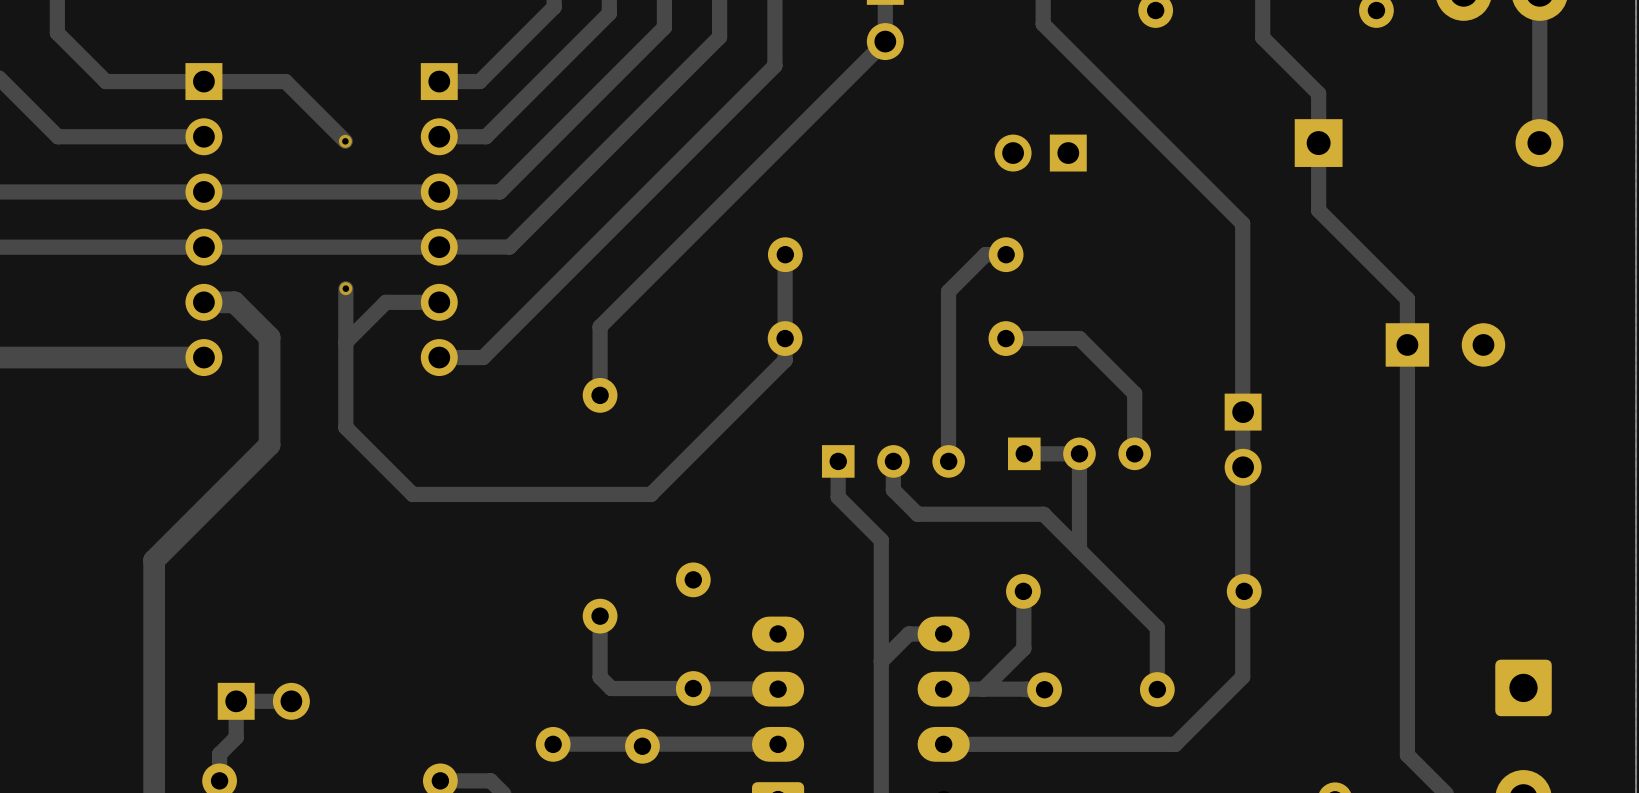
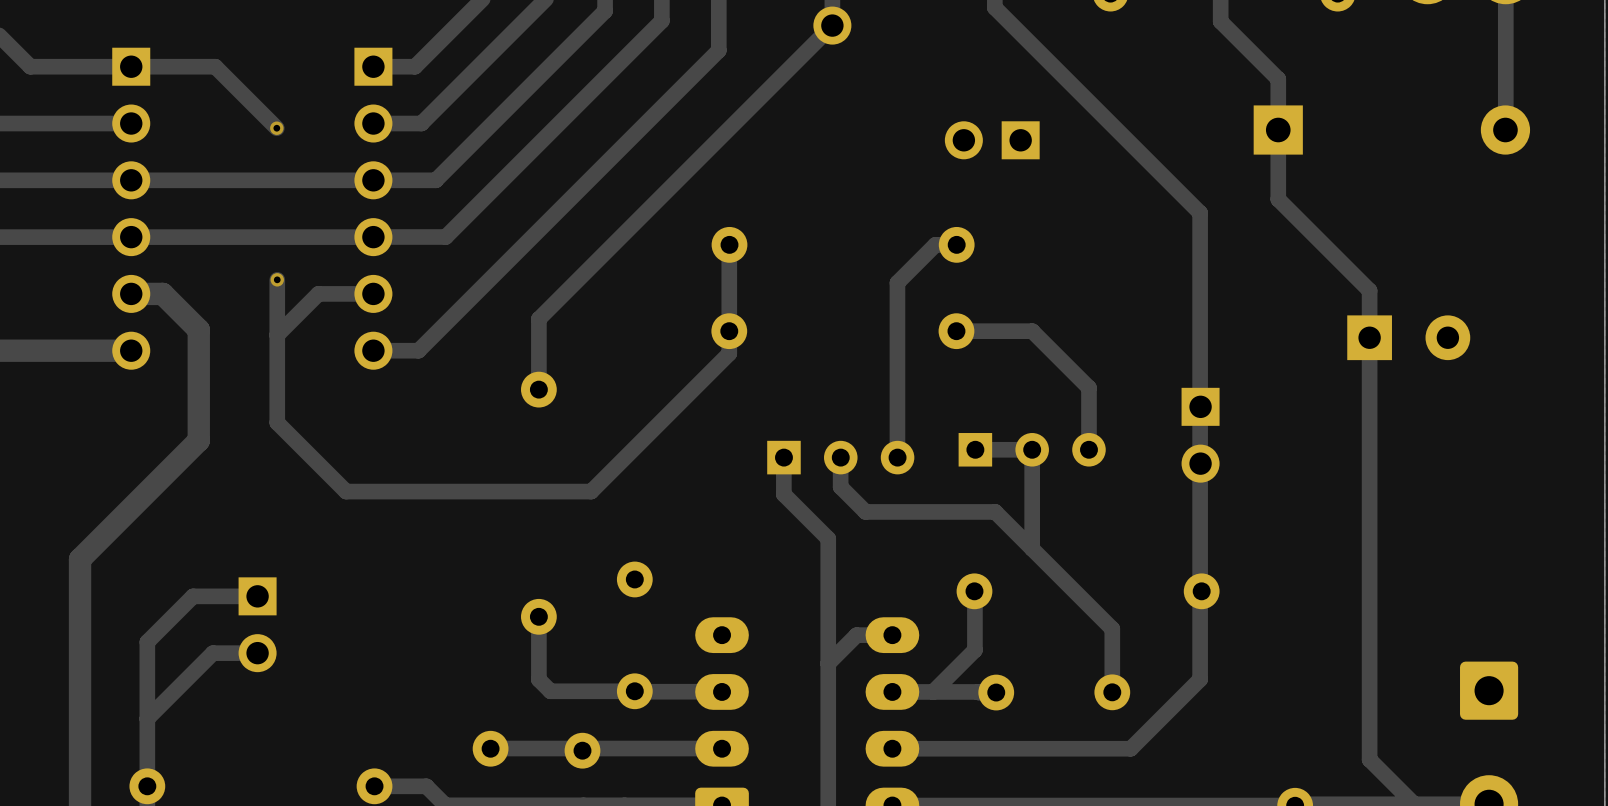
track: none -> (257, 653) (212, 653) (147, 718)
part rotation: 0° (263, 701) -> 90° clockwise (257, 624)
part position: (263, 701) -> (257, 624)
track: (291, 701) (236, 701) (236, 737) (219, 754) -> (257, 596) (193, 596) (147, 642) (147, 758)

